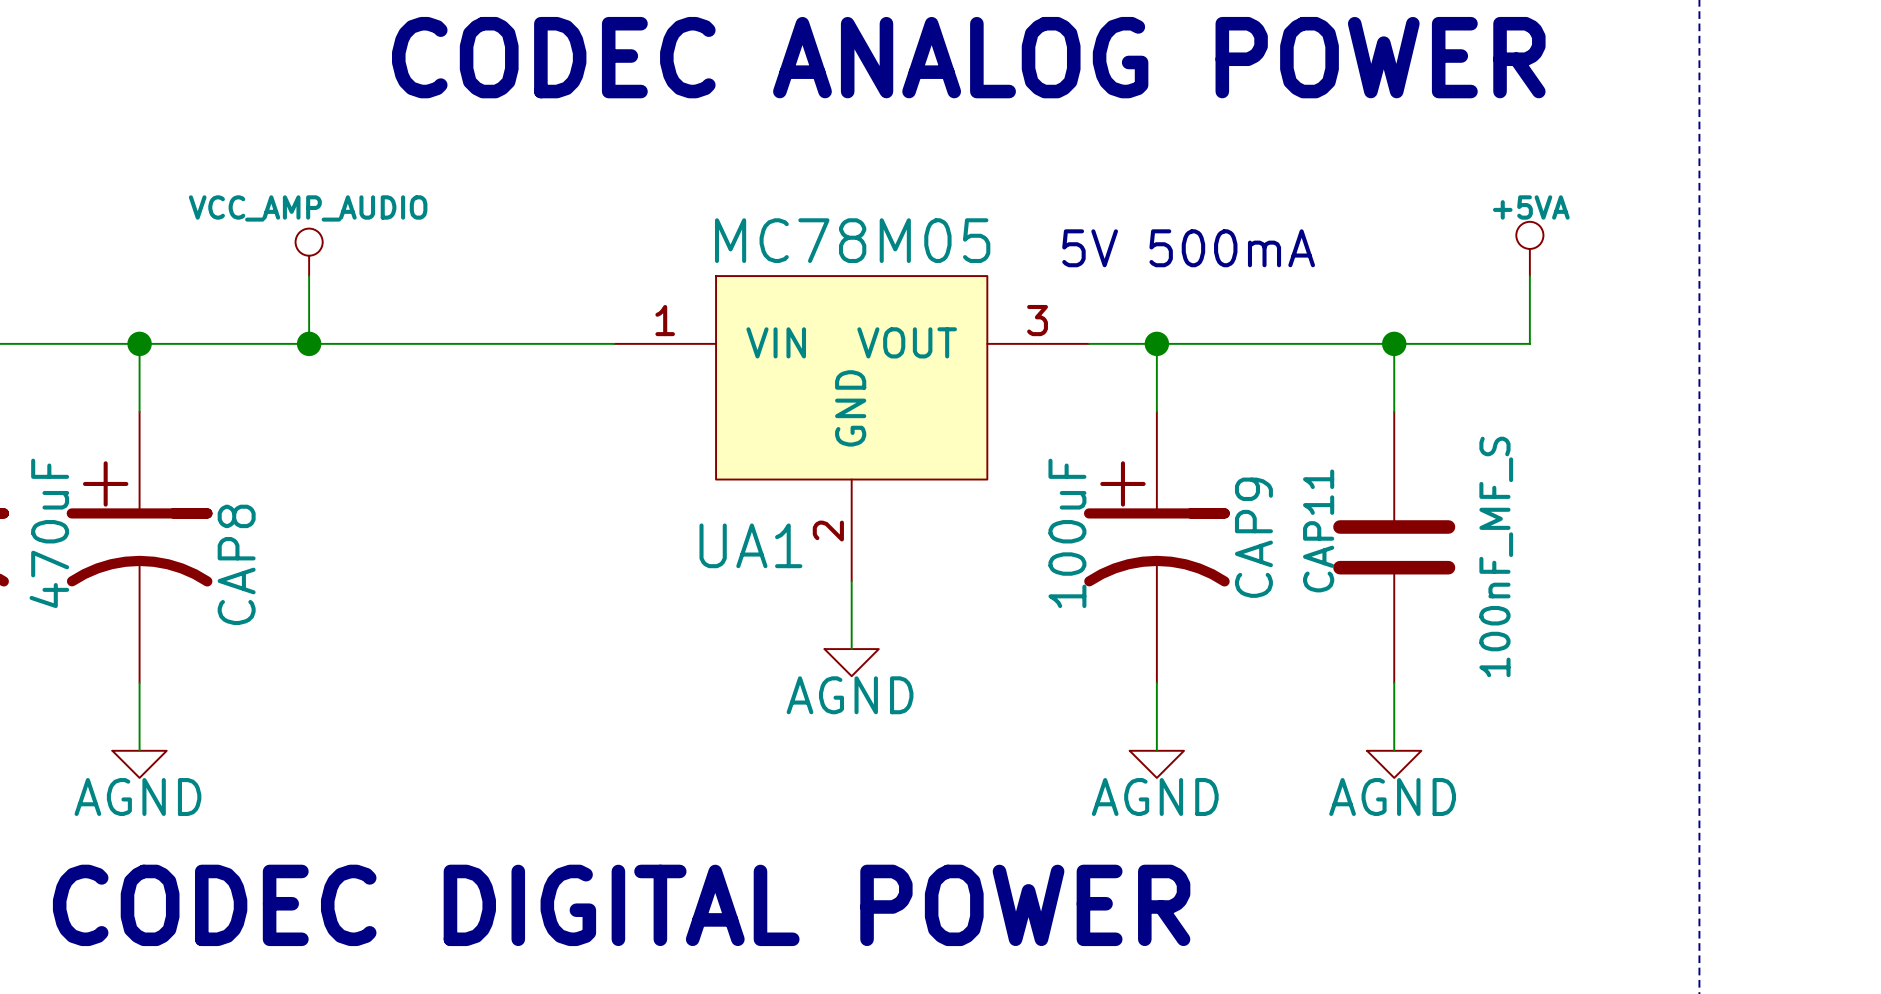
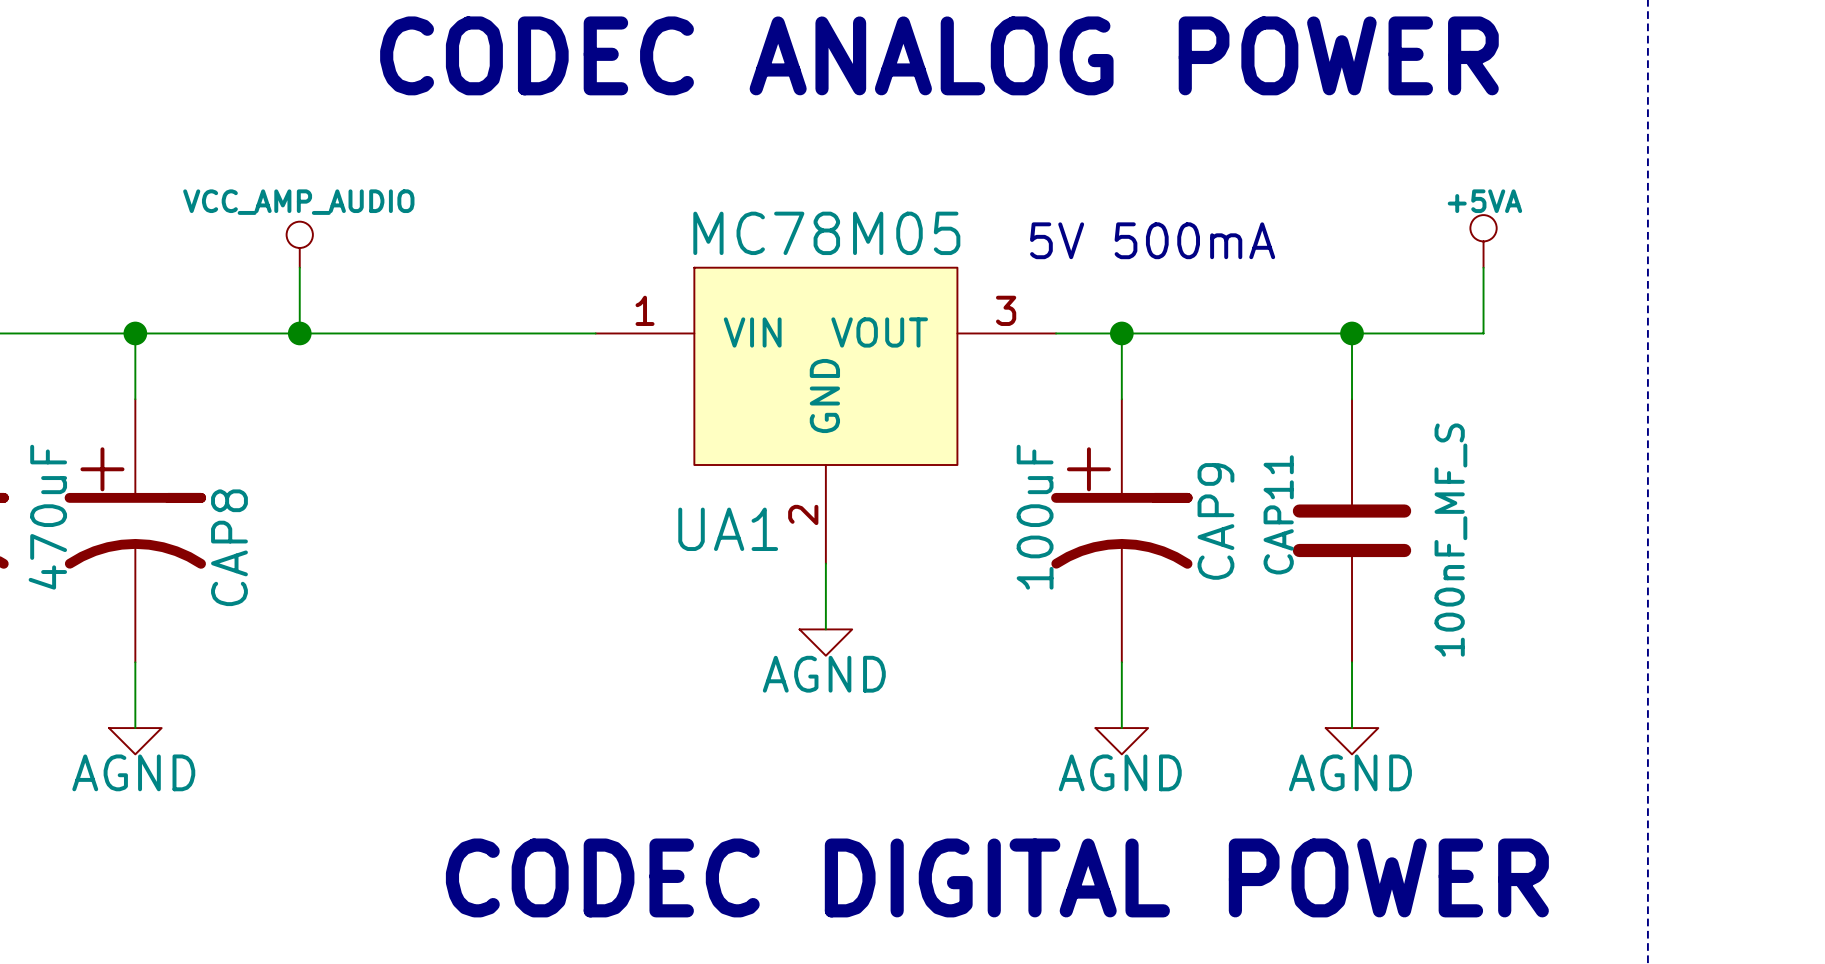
text position: CODEC DIGITAL POWER (621, 905) -> CODEC DIGITAL POWER (997, 877)

